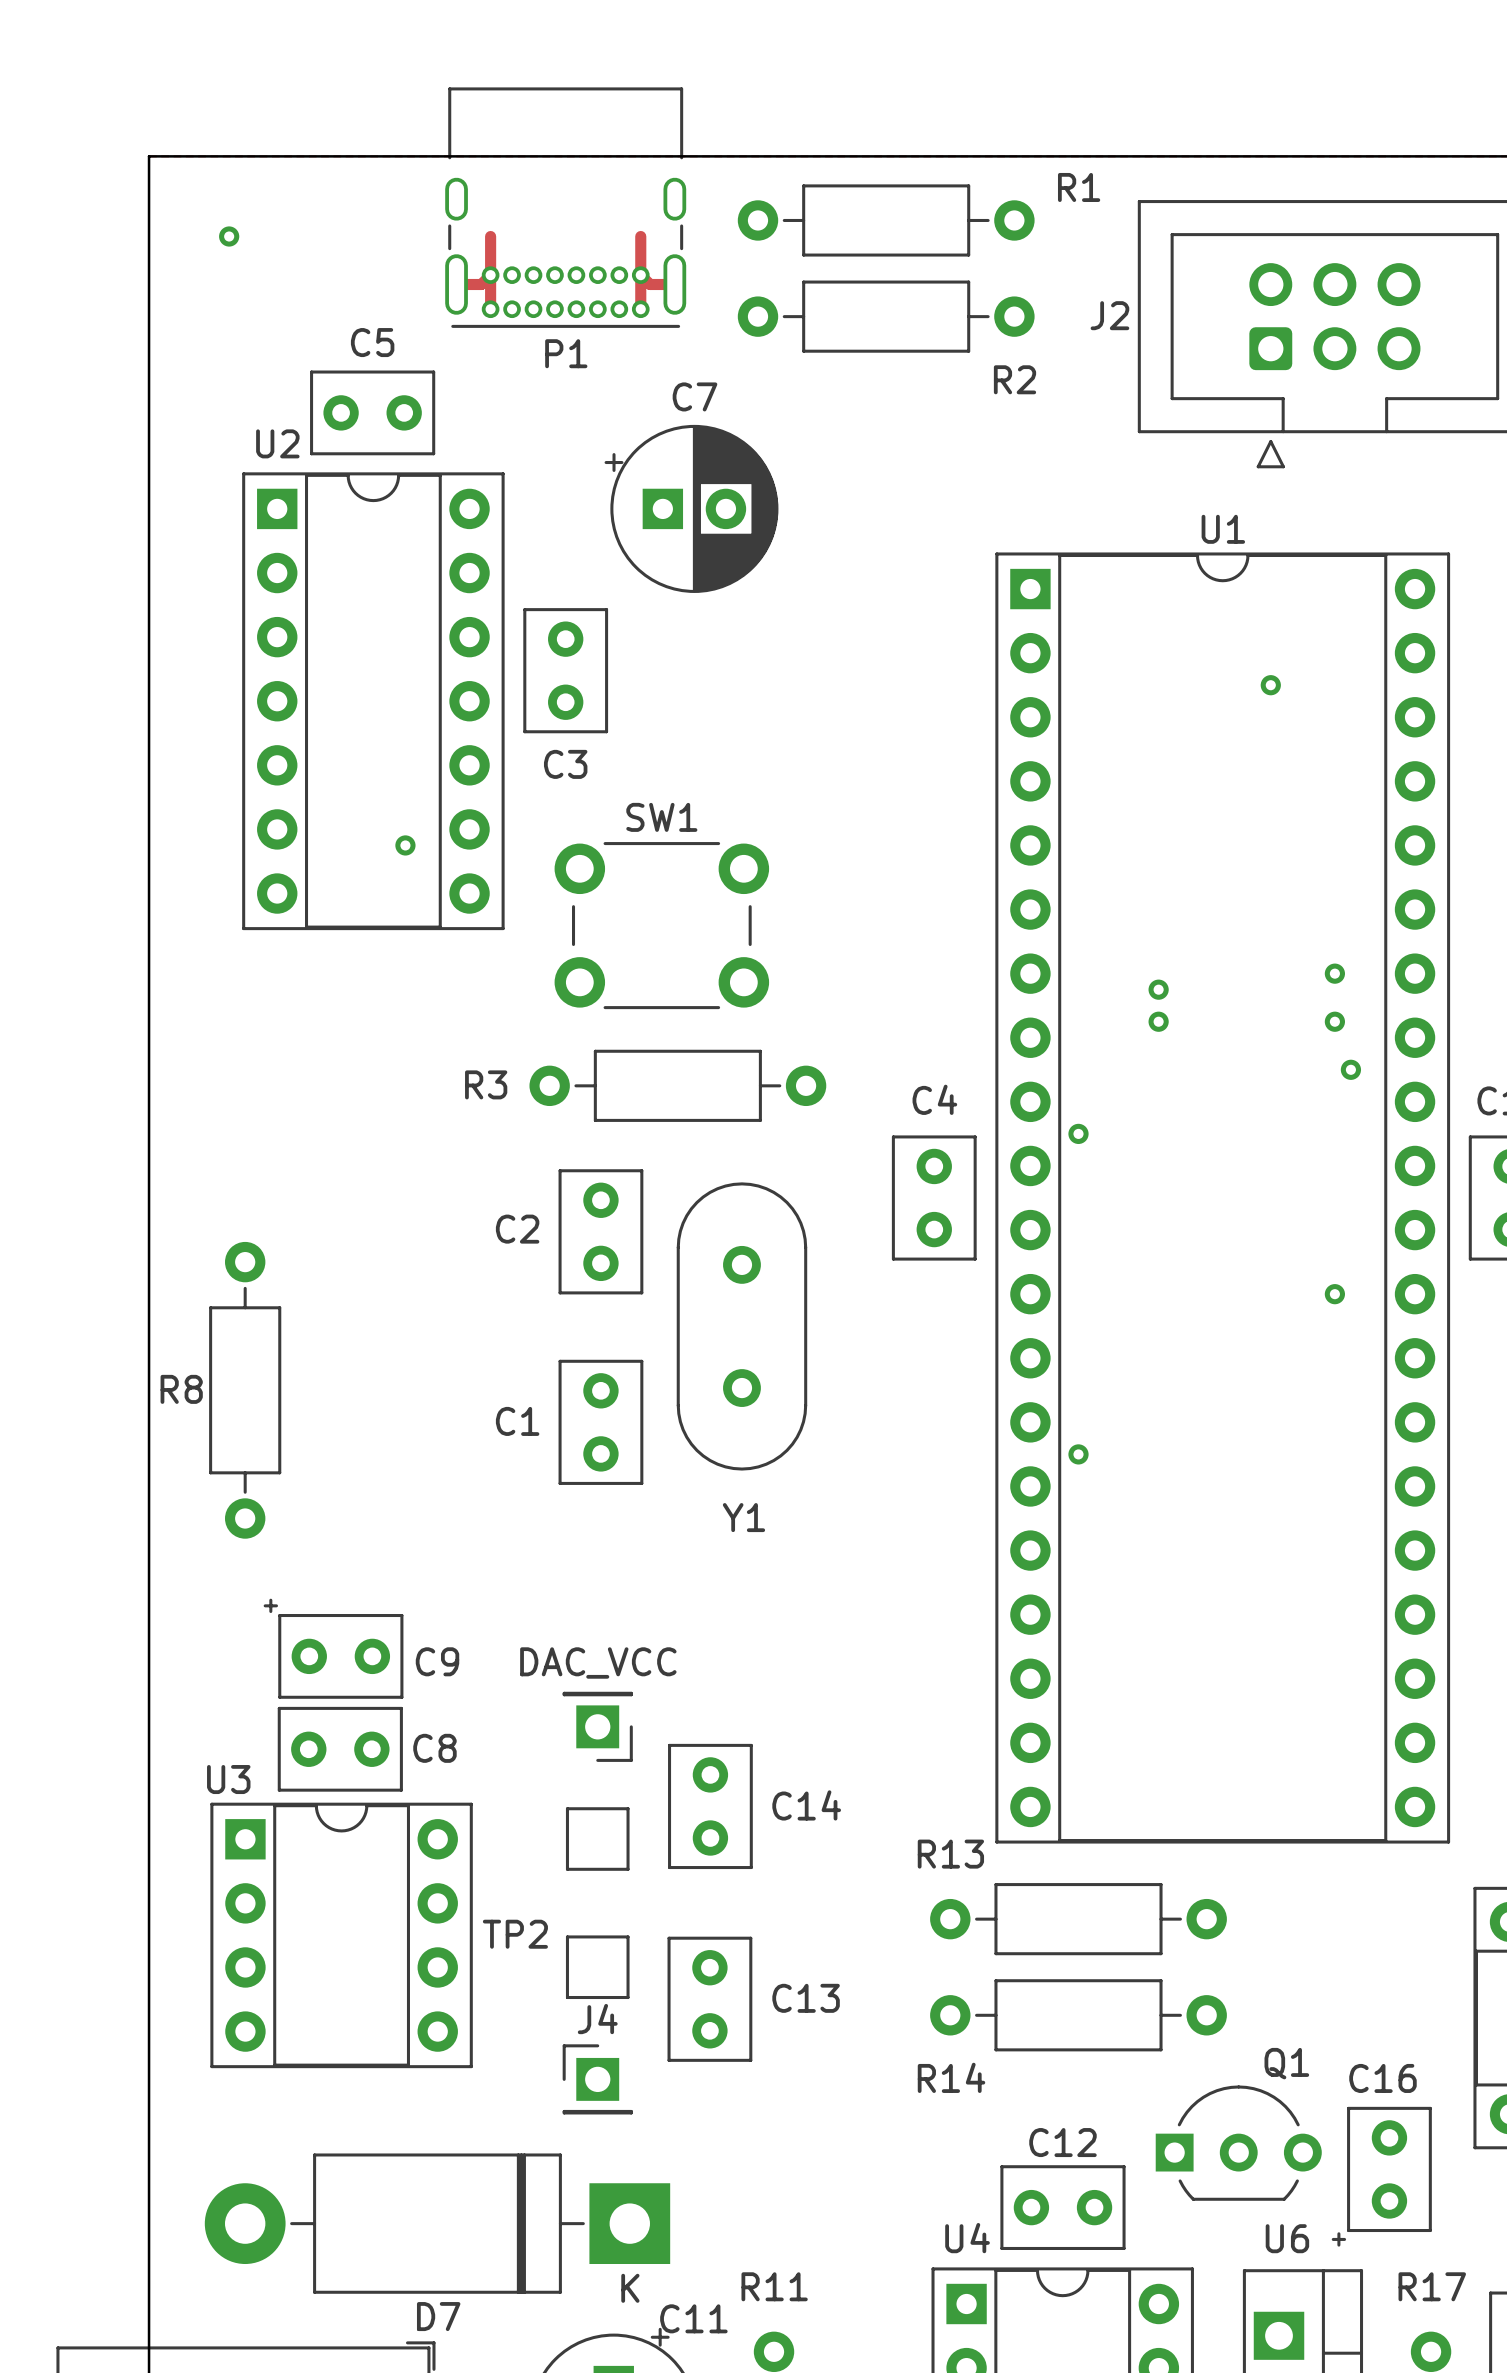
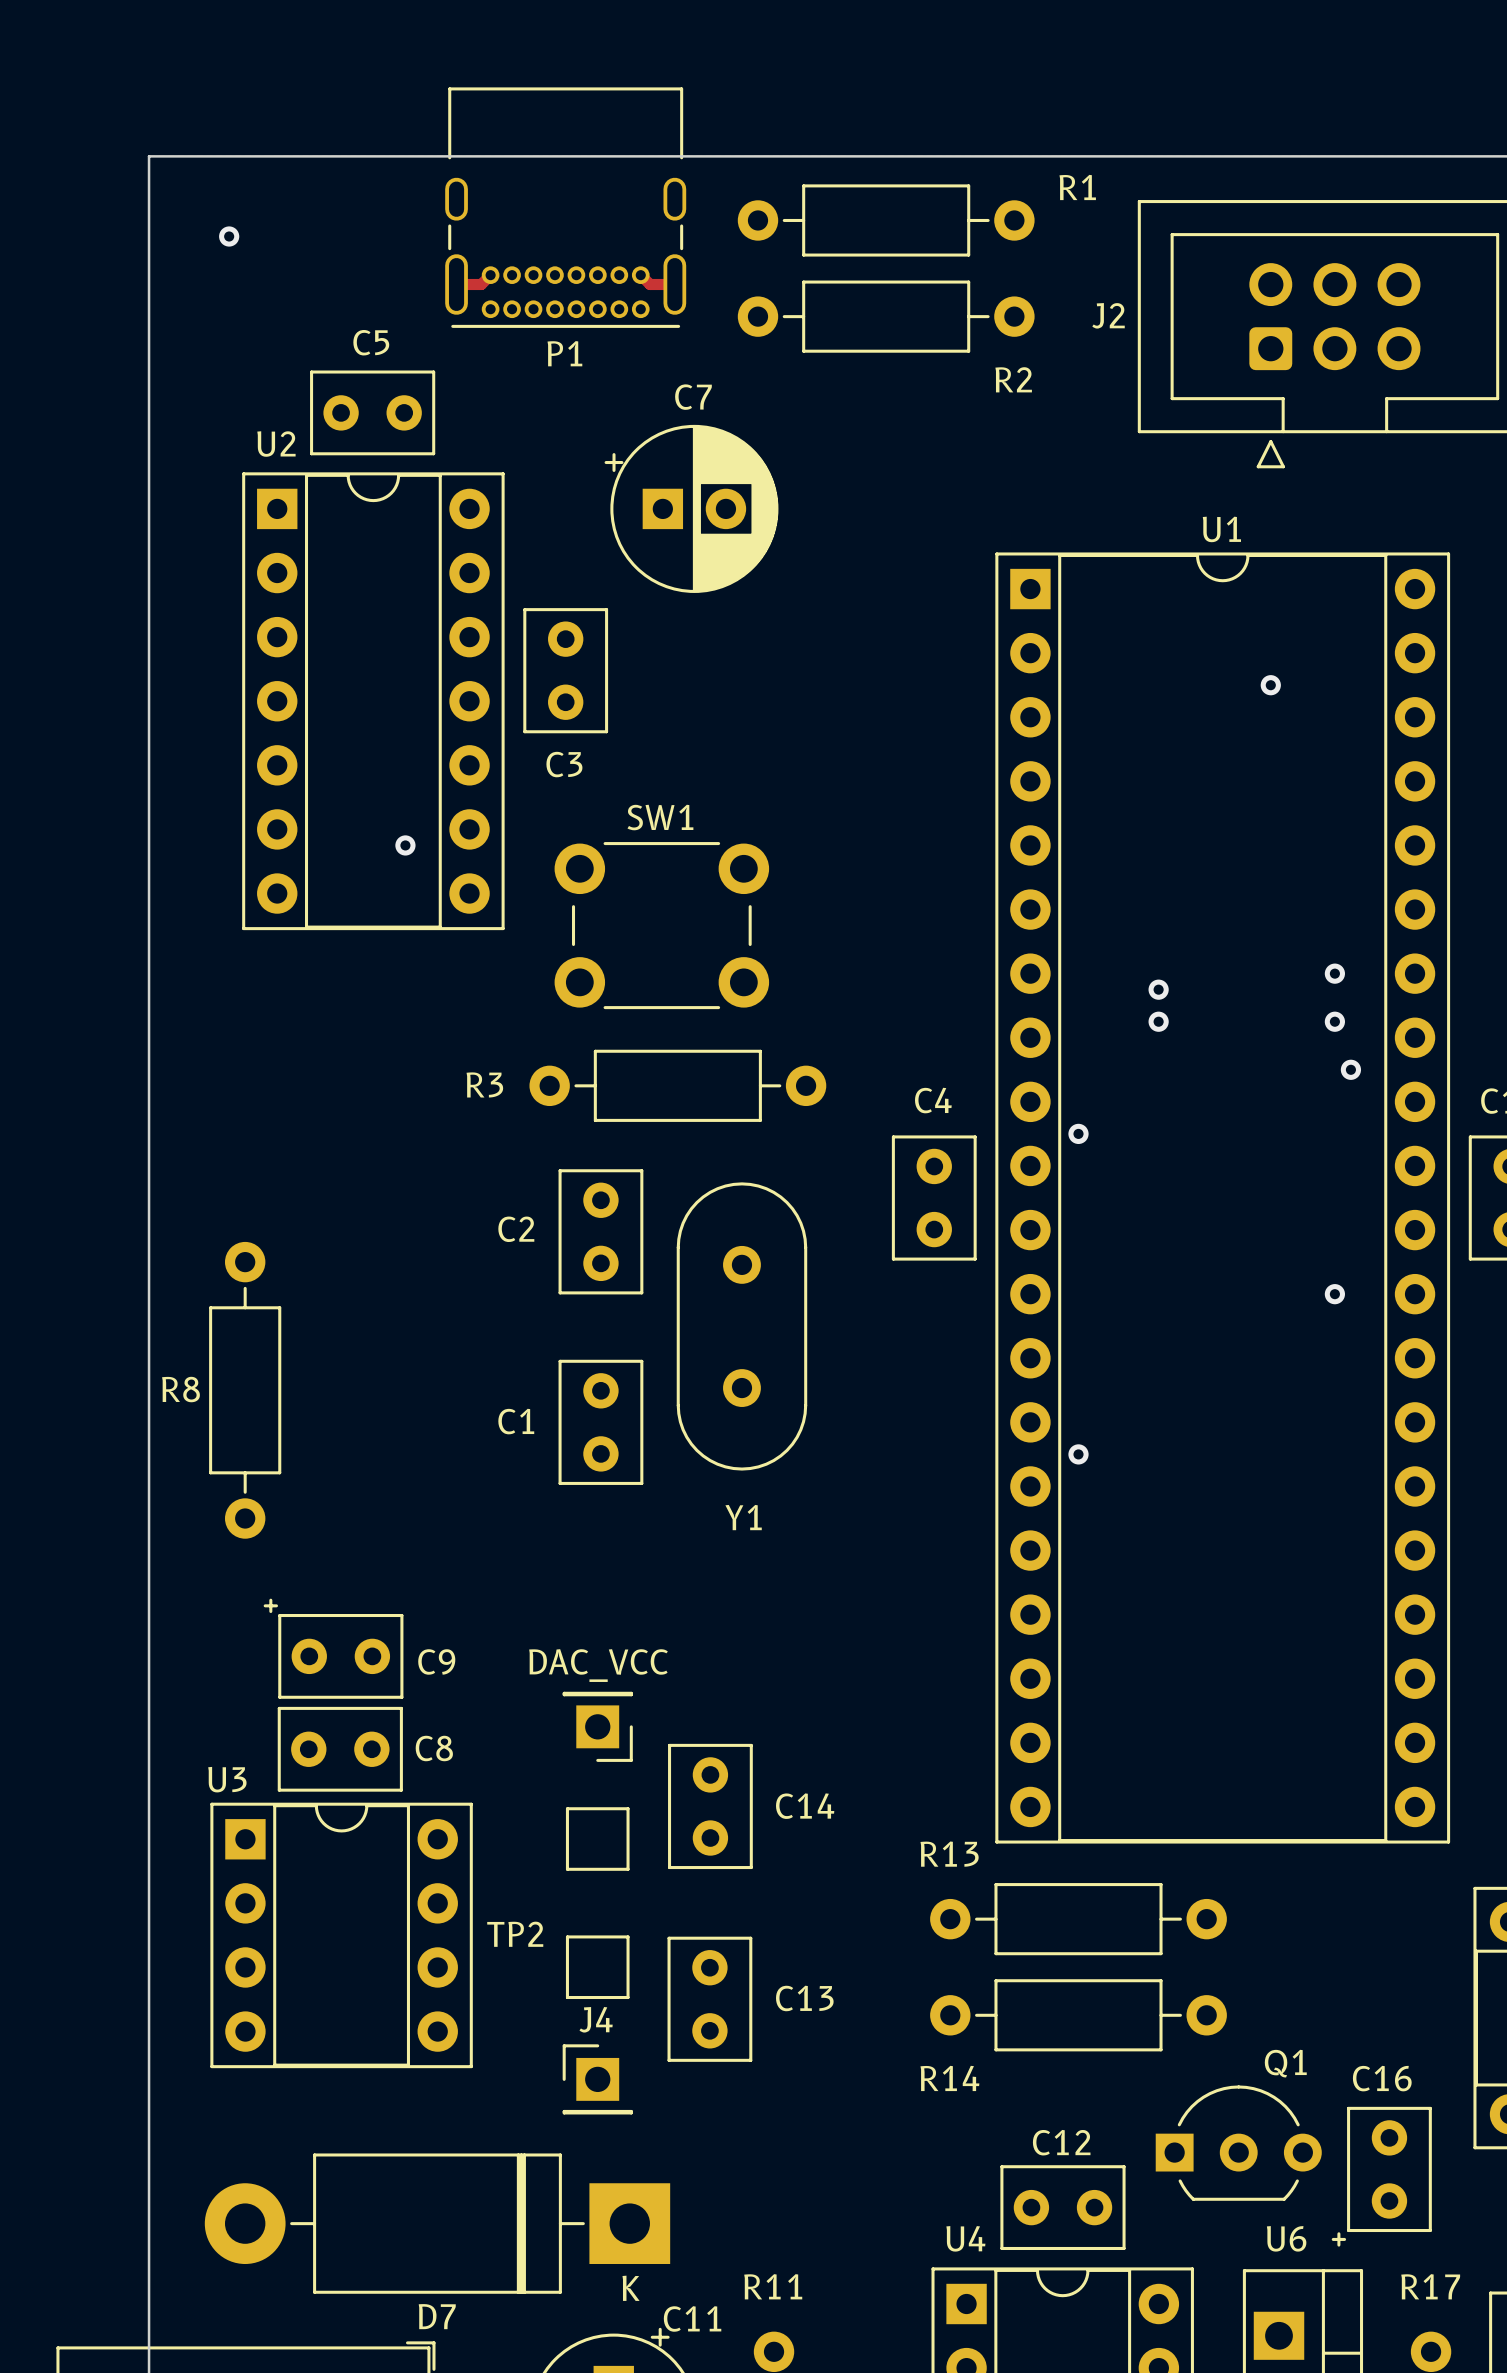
track: (490, 236) (490, 309) -> none
track: (640, 236) (640, 309) -> none

